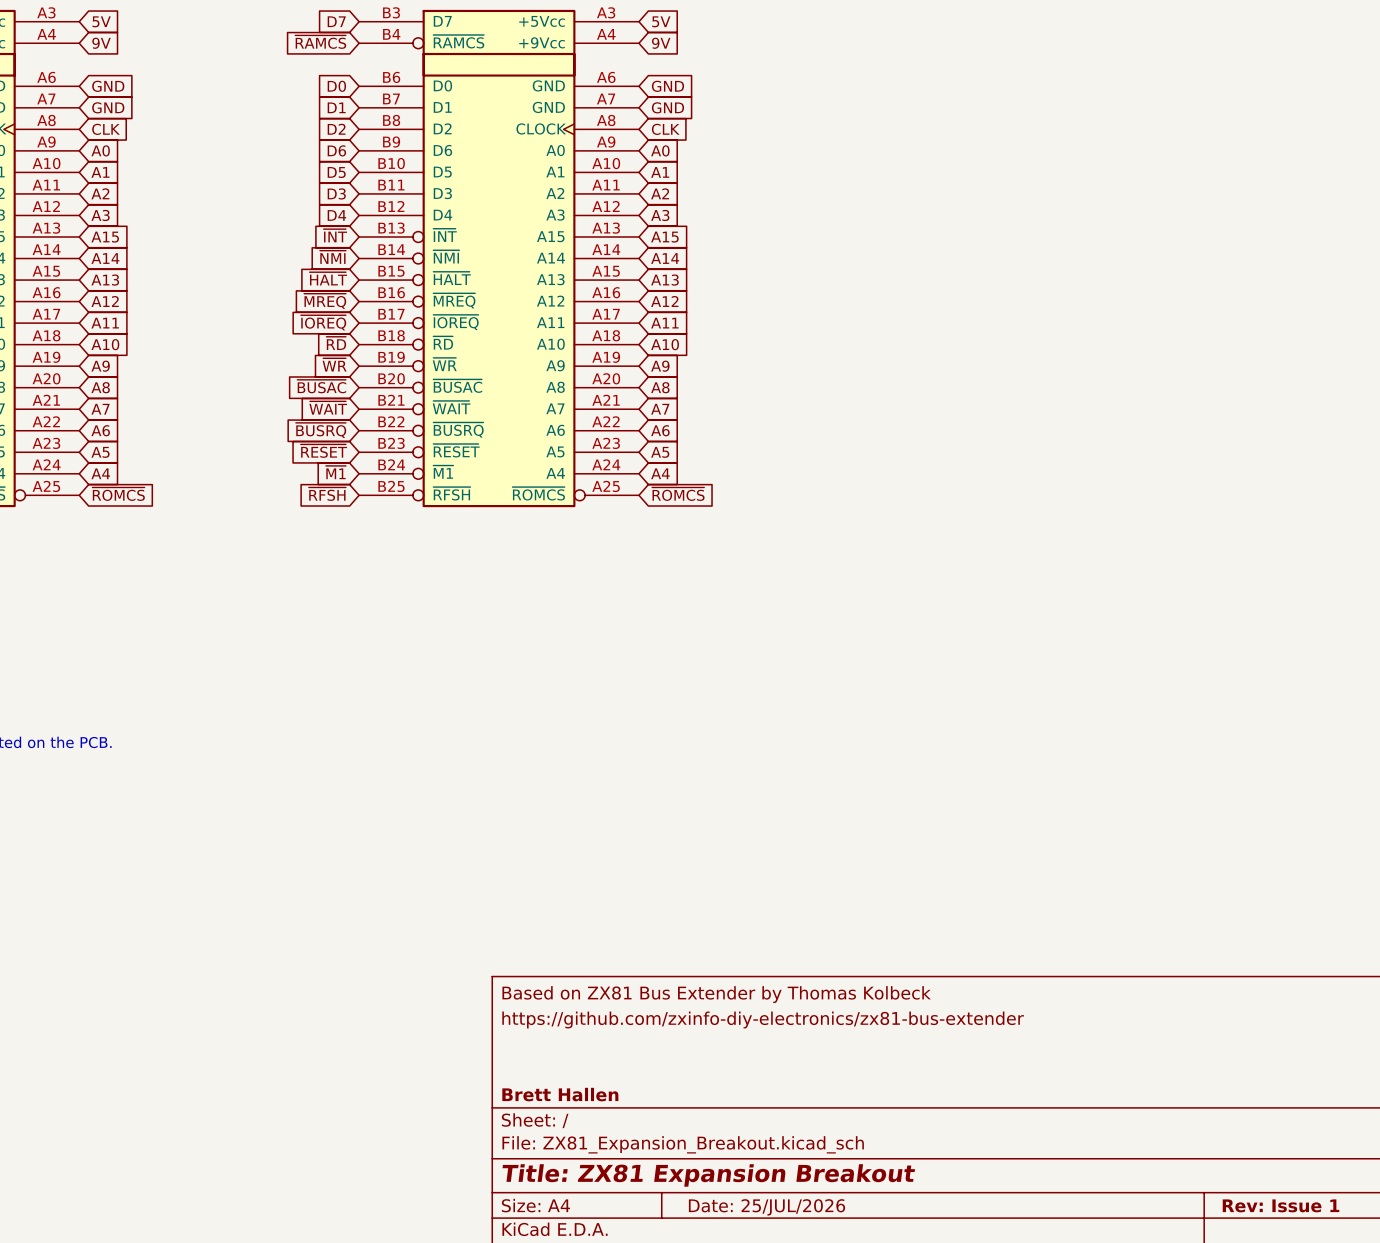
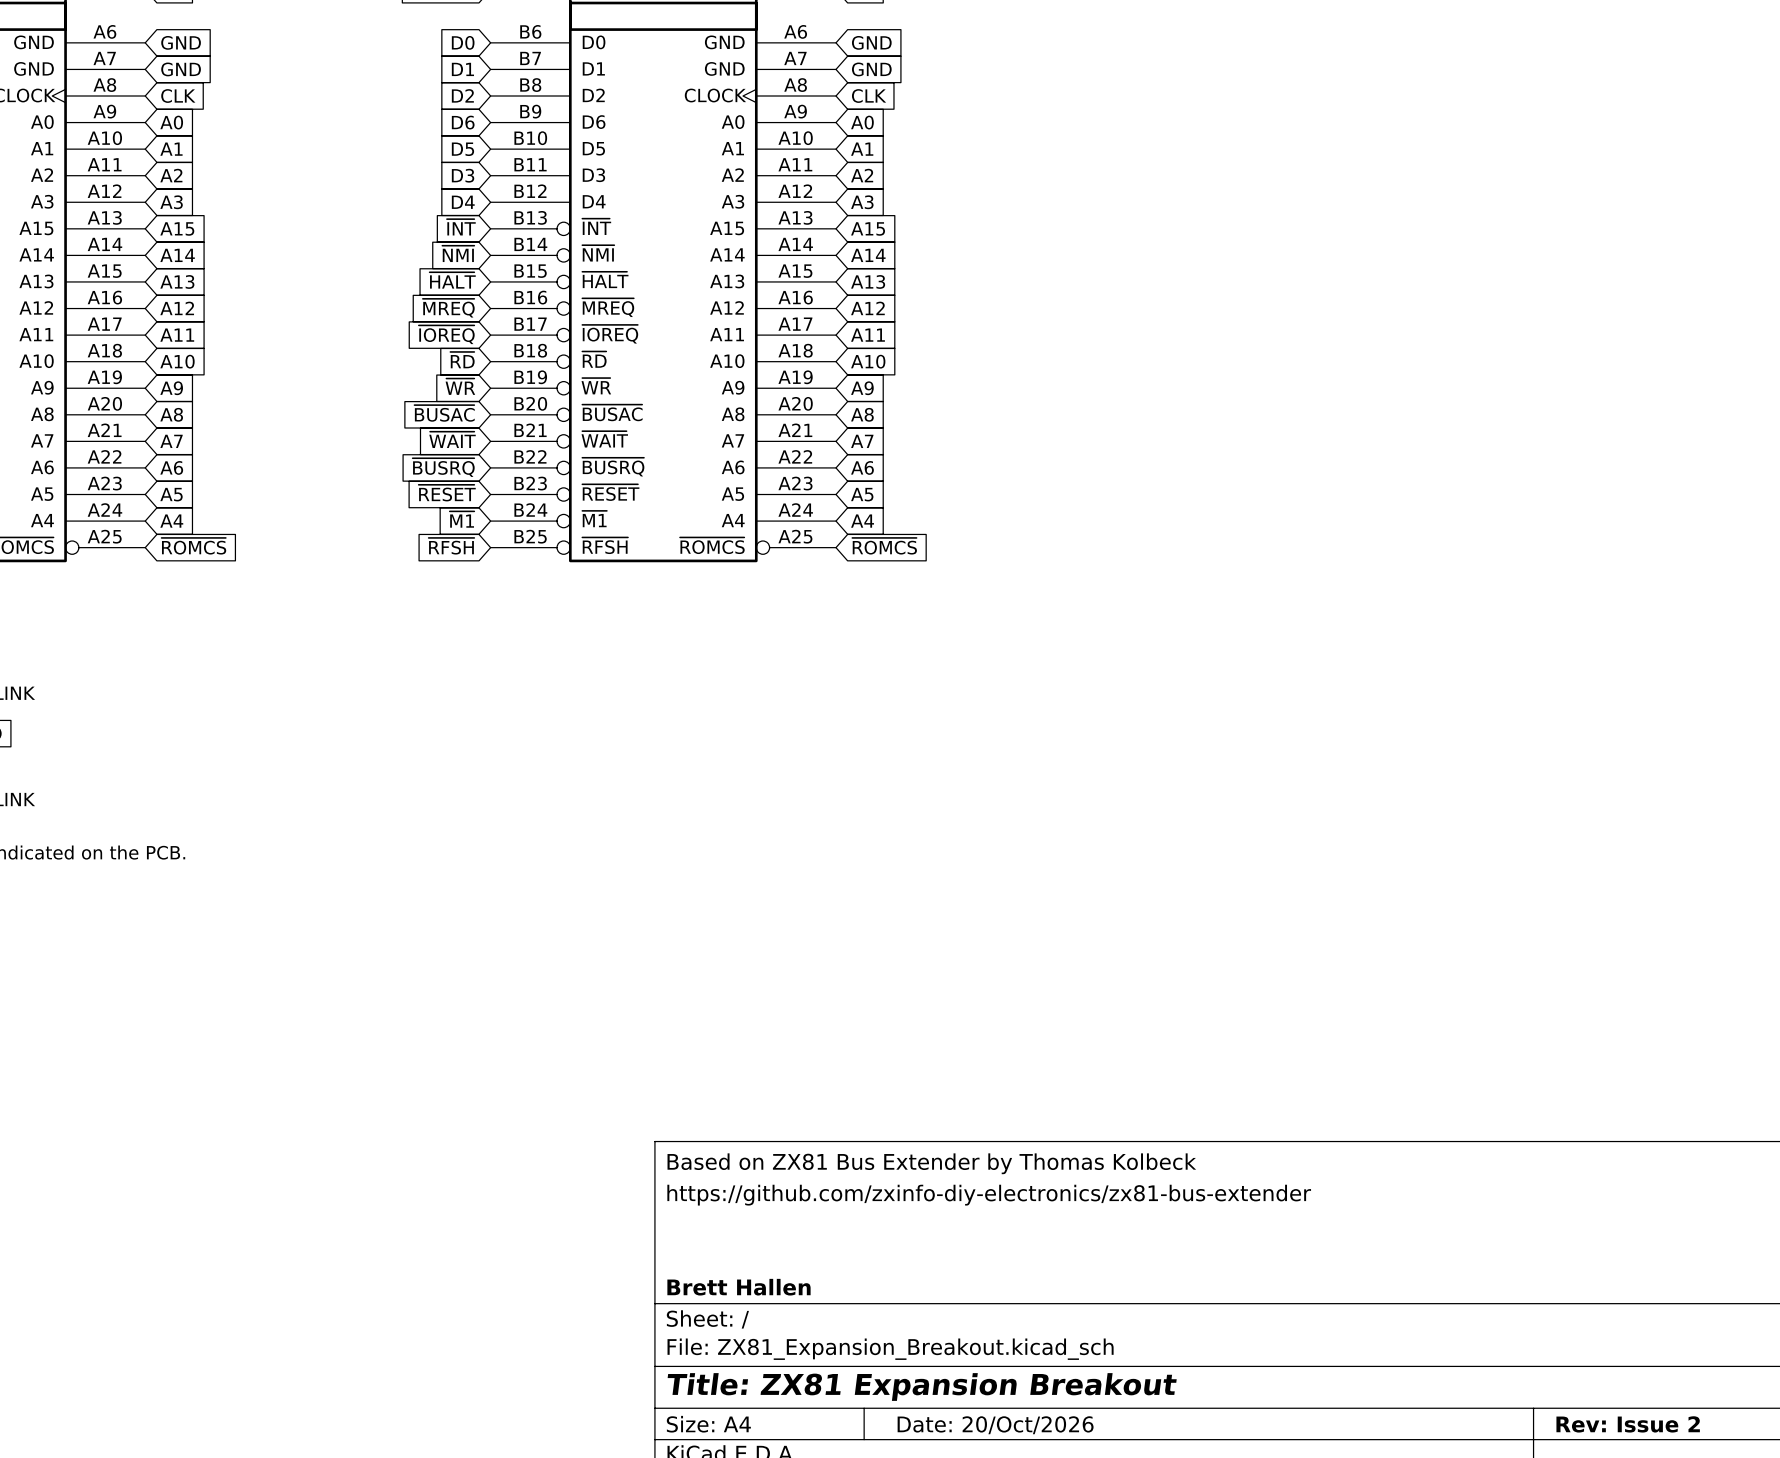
title block: Rev: Issue 1 (1281, 1205) -> Rev: Issue 2 (1628, 1424)
title block: Date: 25/JUL/2026 (767, 1207) -> Date: 20/Oct/2026 (995, 1425)

